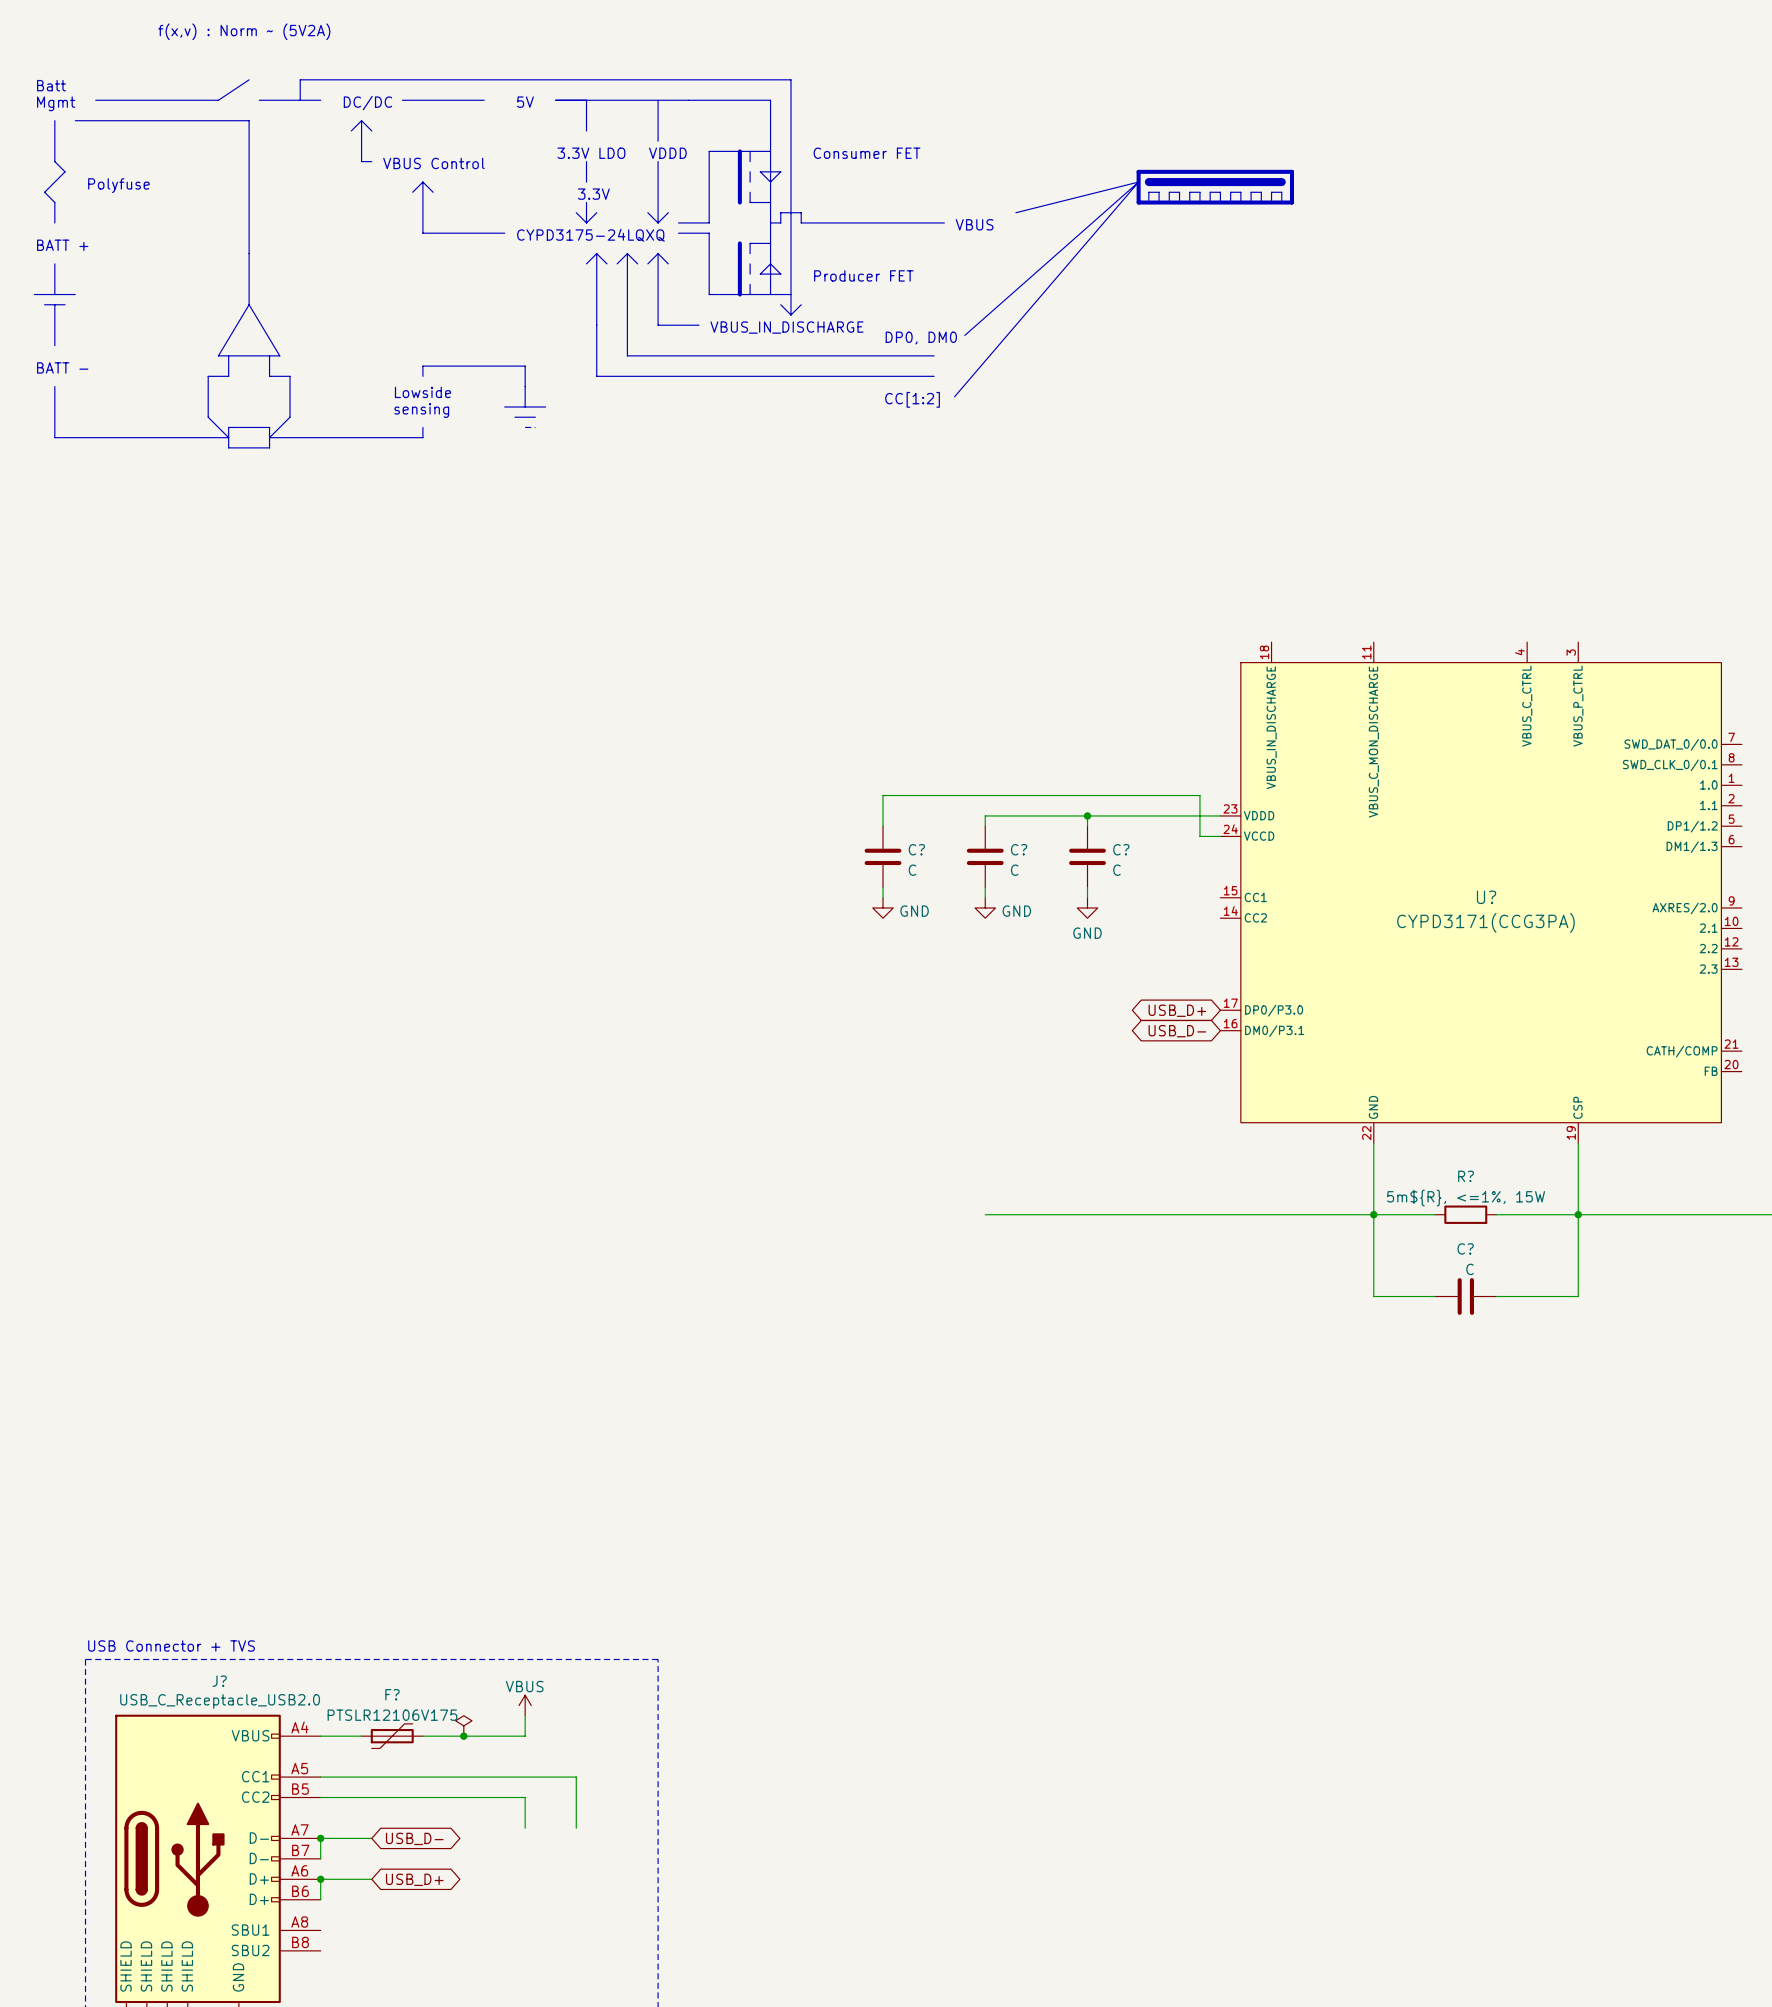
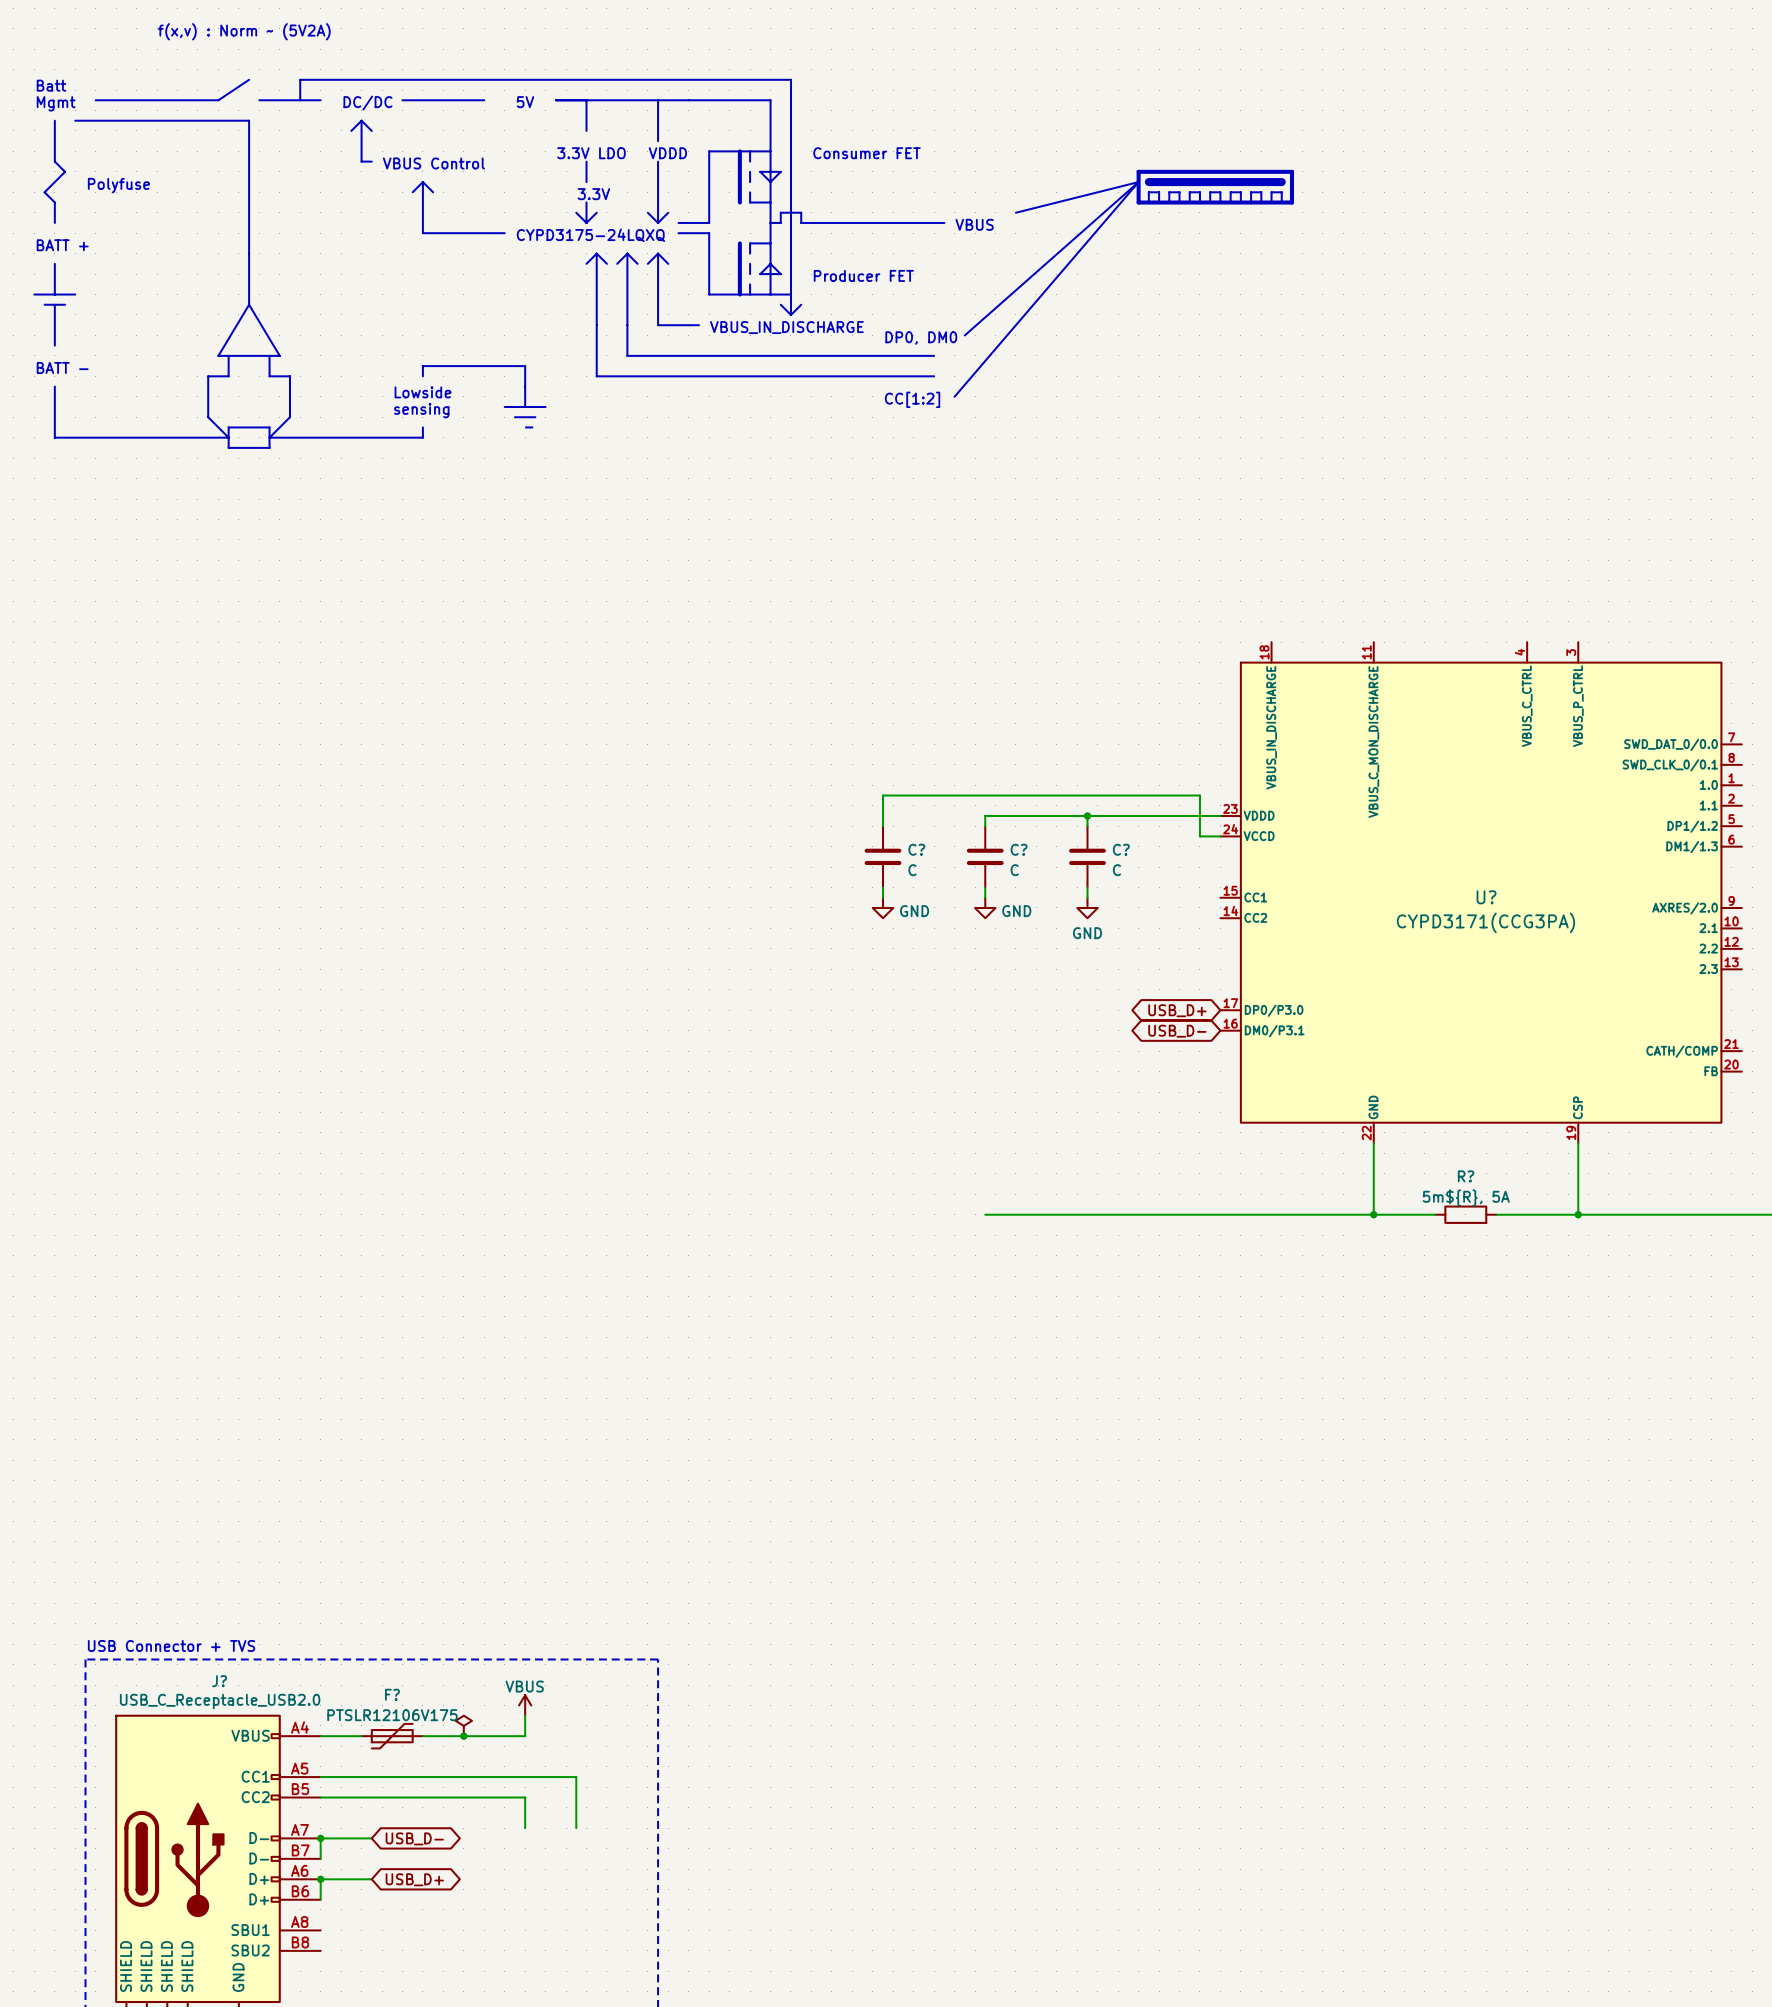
R? value: 5m${R}, <=1%, 15W (1466, 1198) -> 5m${R}, 5A (1466, 1198)
wire: (1373, 1214) (1373, 1296) (1435, 1296) -> none
wire: (1578, 1214) (1578, 1296) (1496, 1296) -> none
C?: C (1465, 1296) -> none

